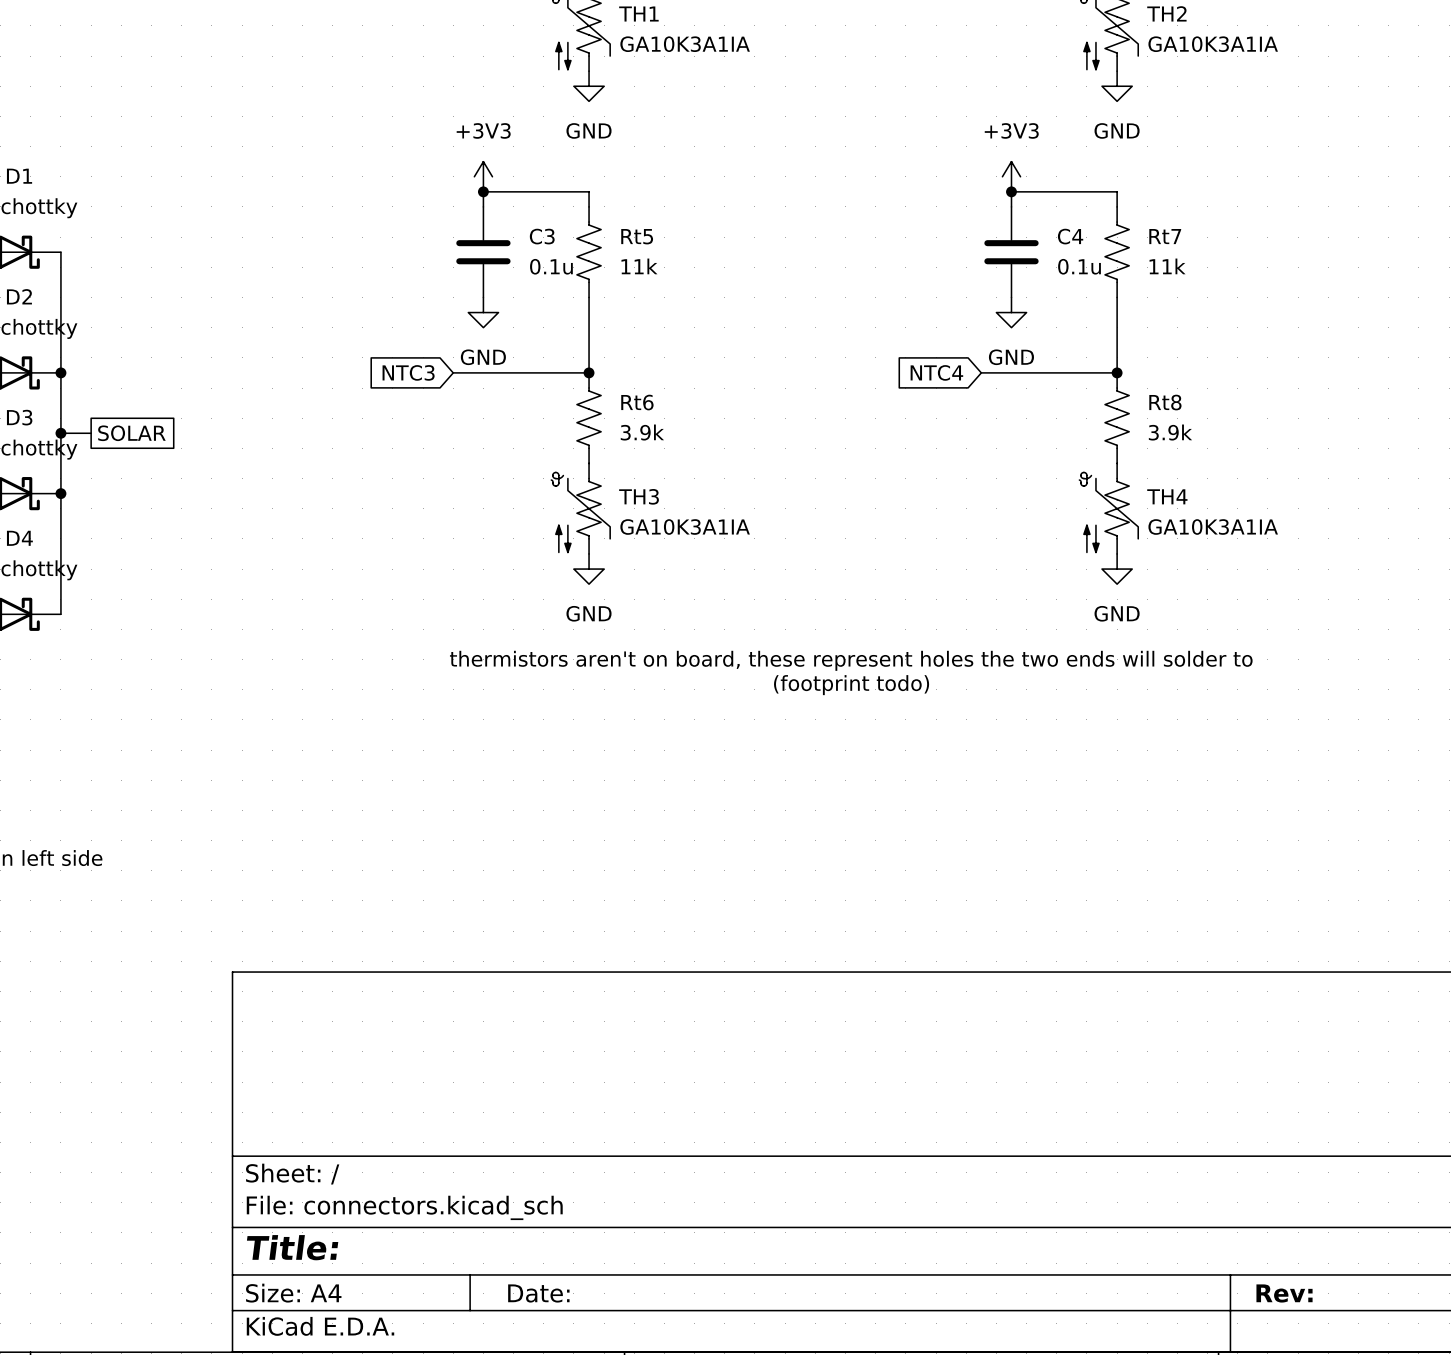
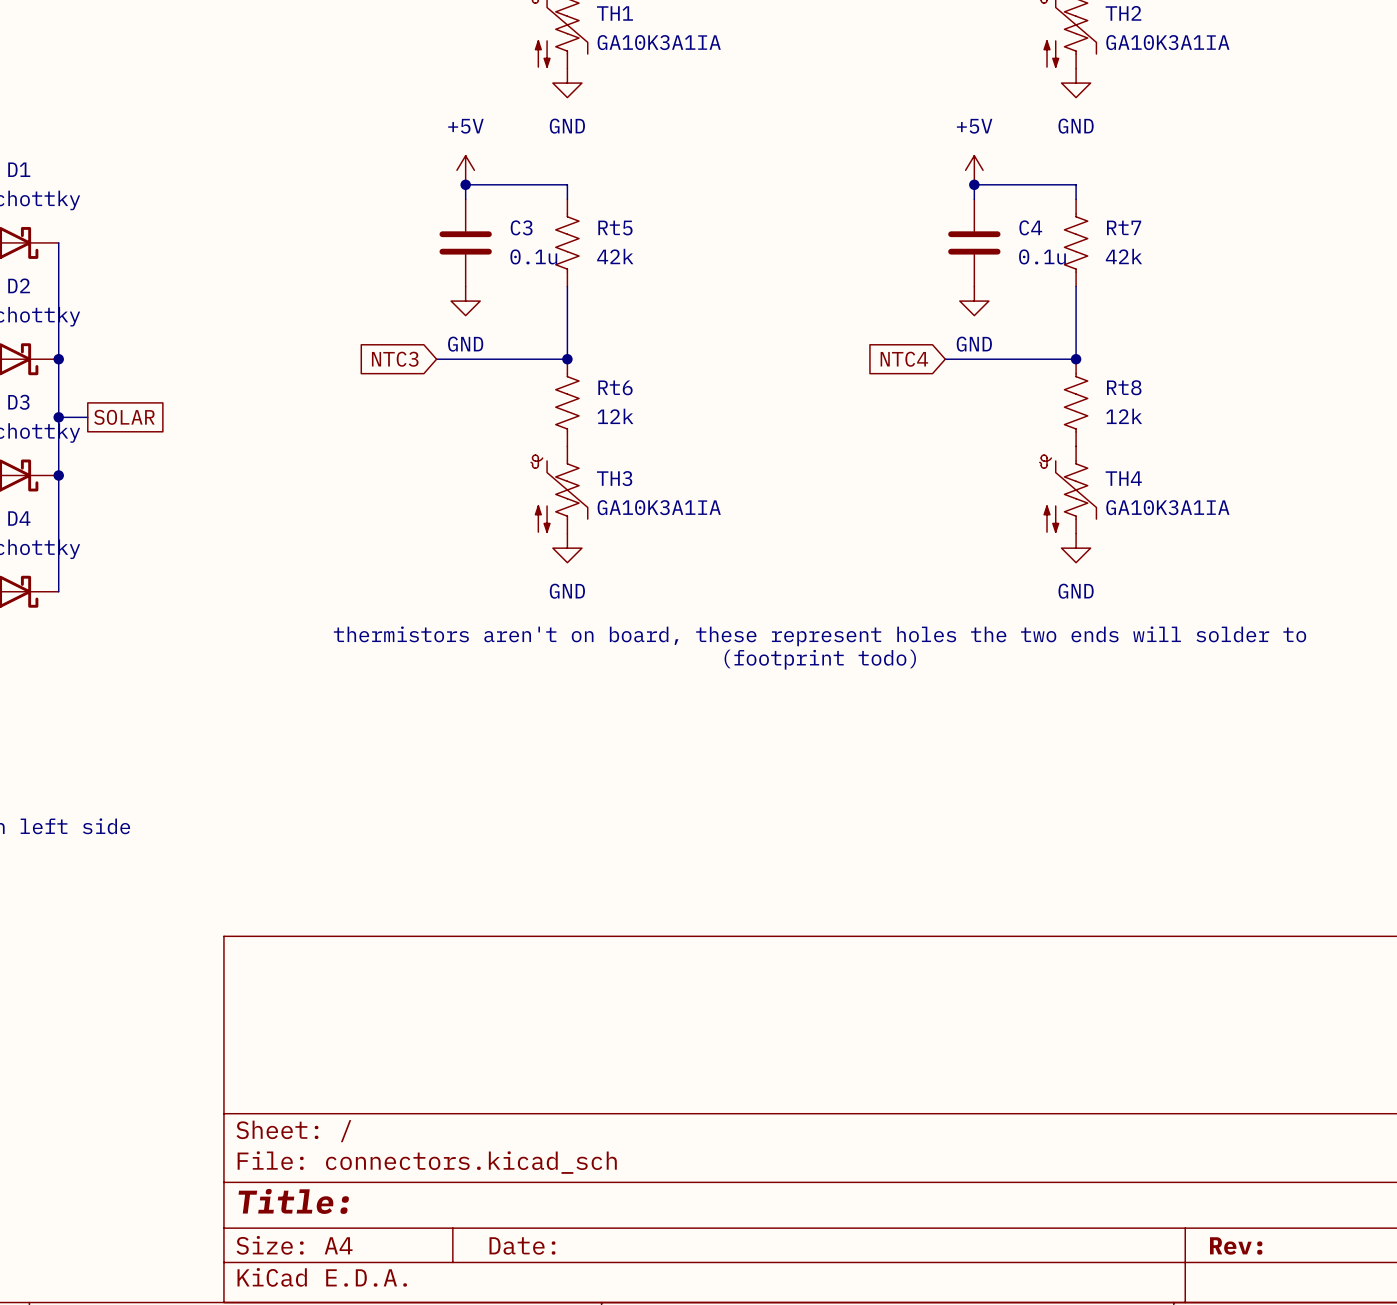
power symbol: +3V3 (483, 176) -> +5V (465, 170)
power symbol: +3V3 (1011, 176) -> +5V (974, 170)
Rt5 value: 11k (639, 266) -> 42k (615, 256)
Rt7 value: 11k (1167, 266) -> 42k (1123, 256)
Rt6 value: 3.9k (642, 432) -> 12k (615, 416)
Rt8 value: 3.9k (1170, 432) -> 12k (1124, 416)

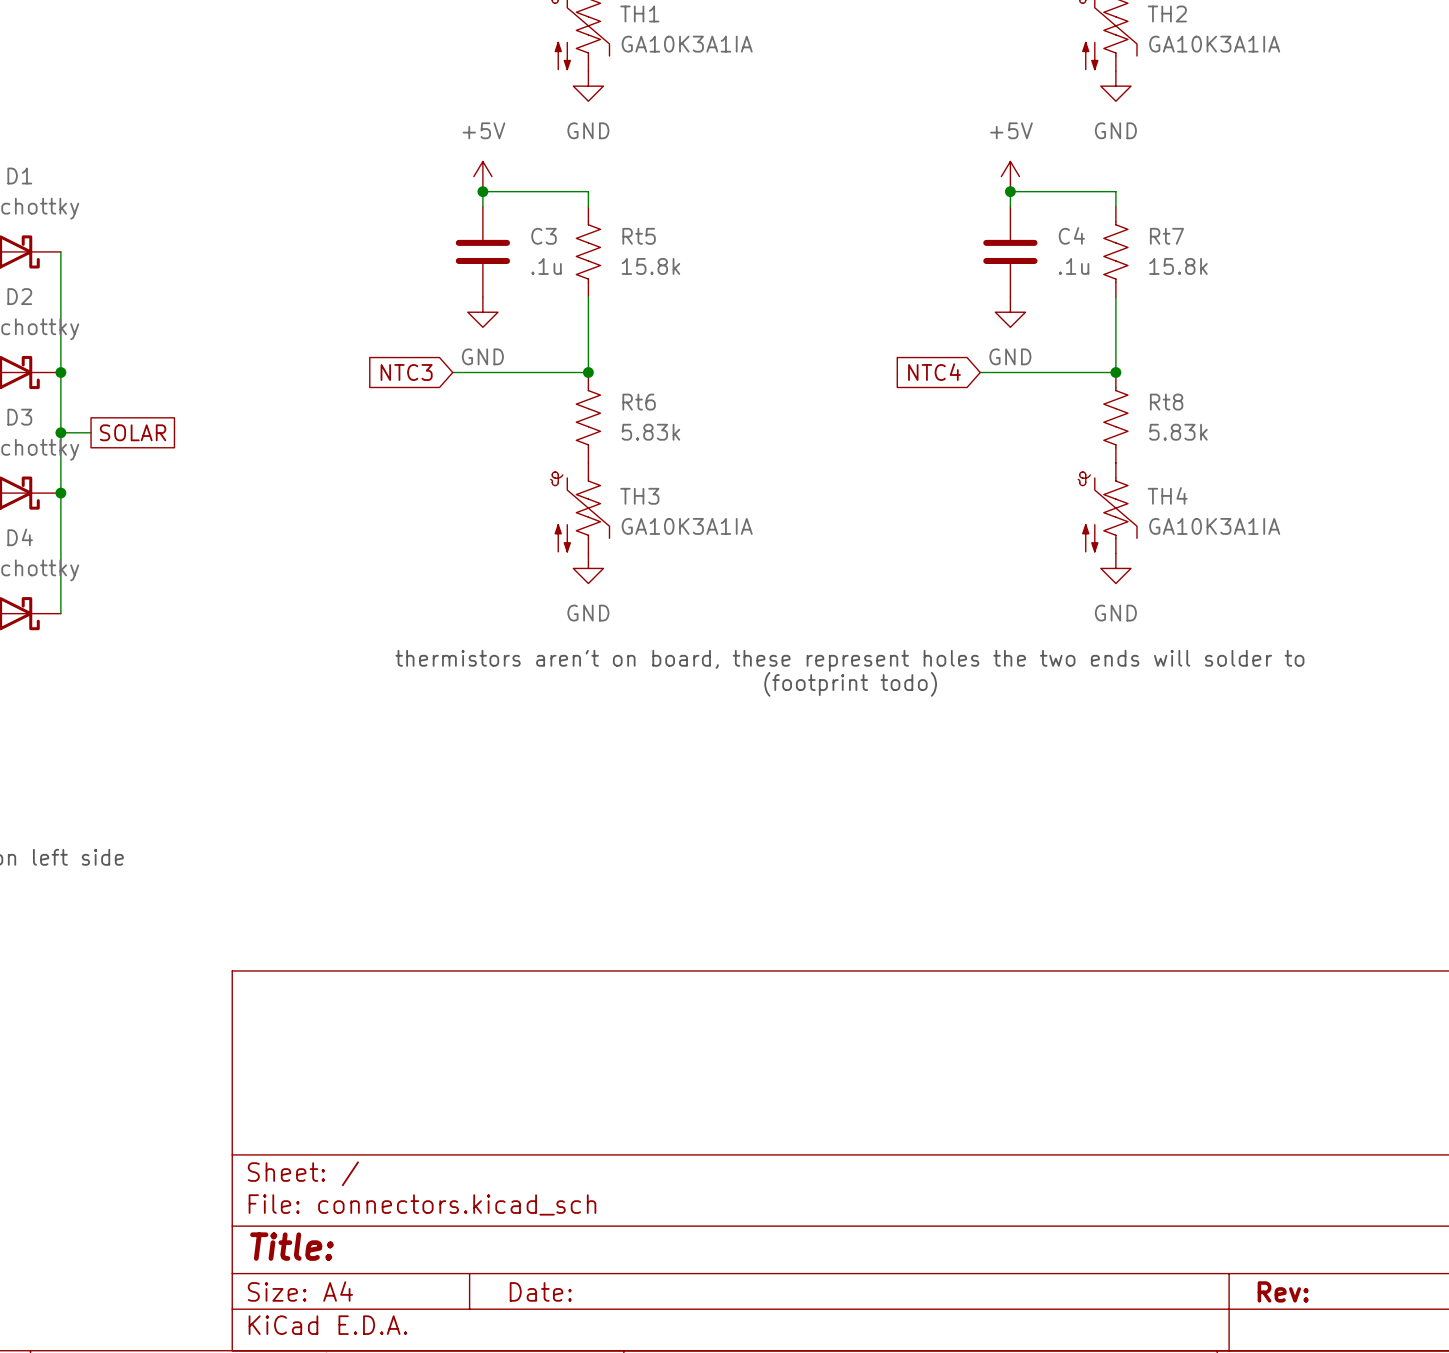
C3 value: 0.1u (533, 256) -> .1u (546, 266)
Rt5 value: 42k (615, 256) -> 15.8k (650, 266)
C4 value: 0.1u (1042, 256) -> .1u (1074, 266)
Rt7 value: 42k (1123, 256) -> 15.8k (1178, 266)
Rt6 value: 12k (615, 416) -> 5.83k (650, 432)
Rt8 value: 12k (1124, 416) -> 5.83k (1178, 432)

